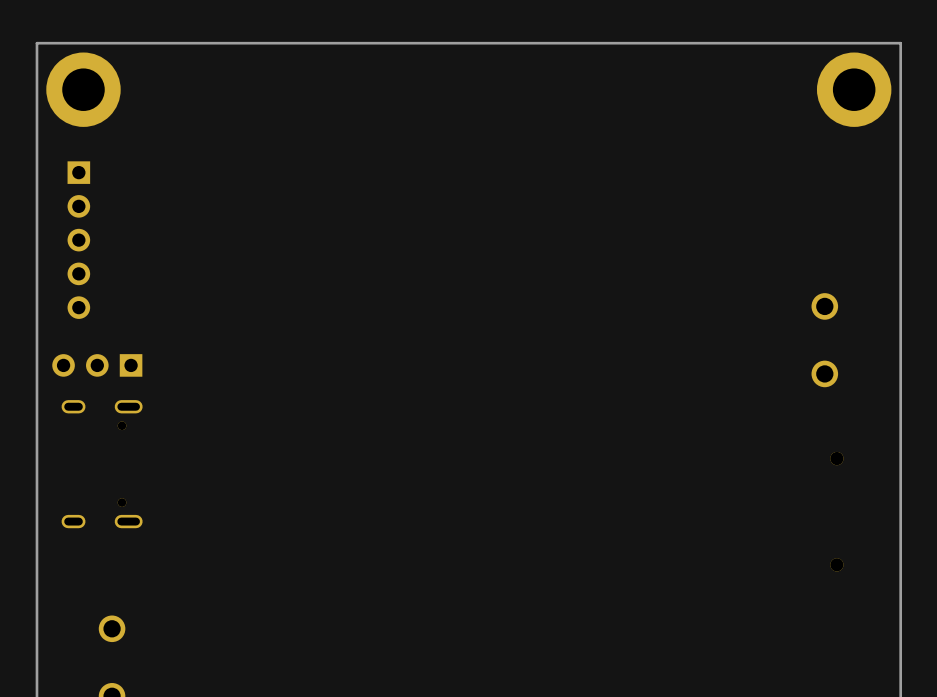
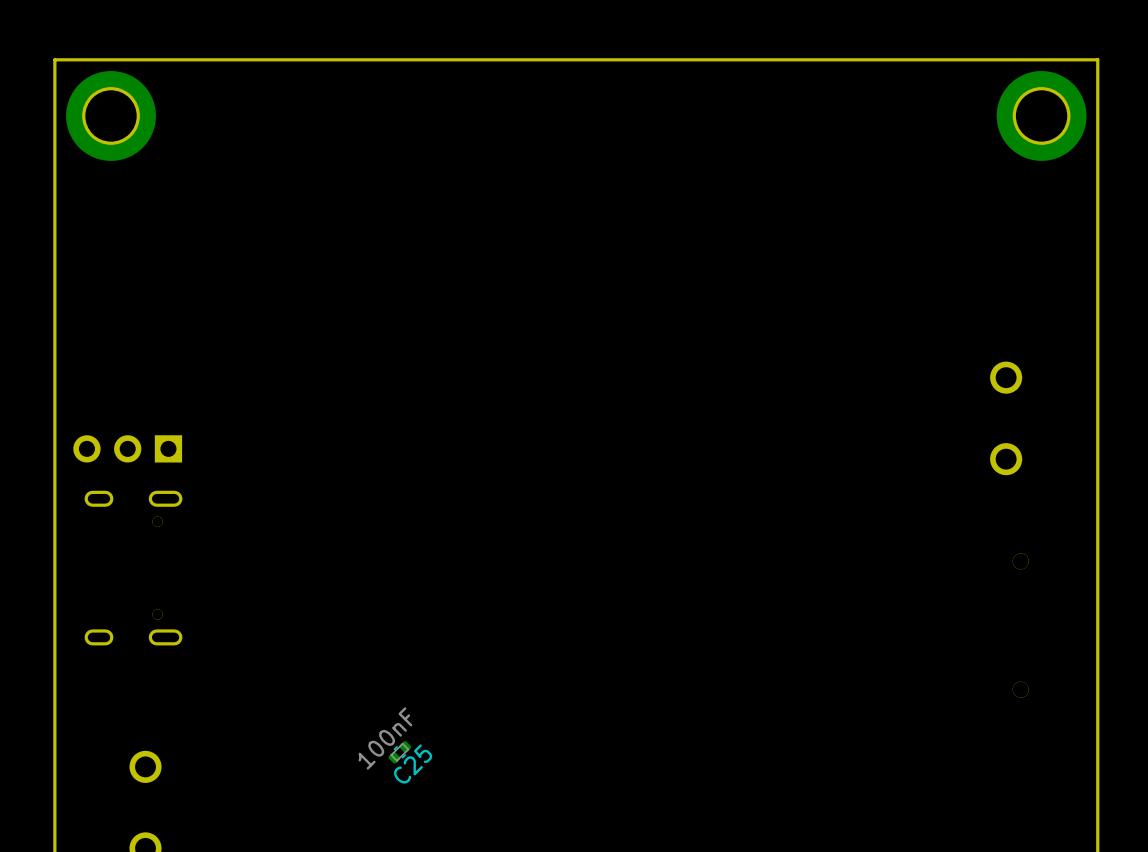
part: (78, 240) -> none
C25: none -> 100nF (399, 752)

